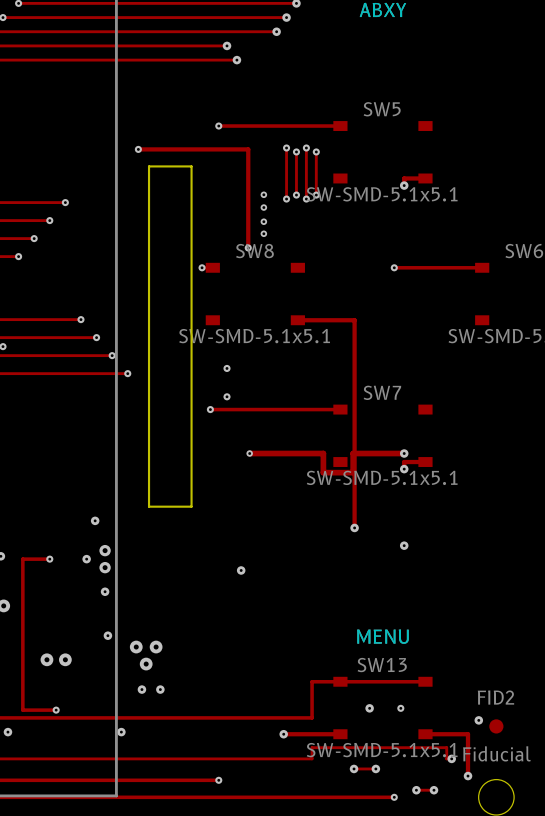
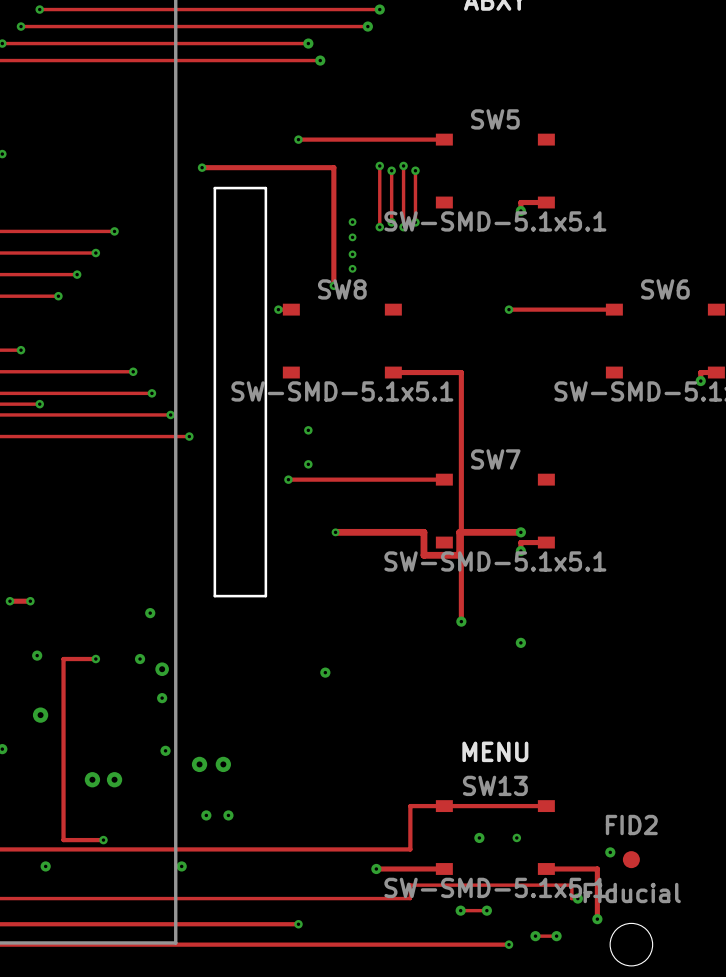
via: (105, 550) -> none
via: (146, 664) -> none

